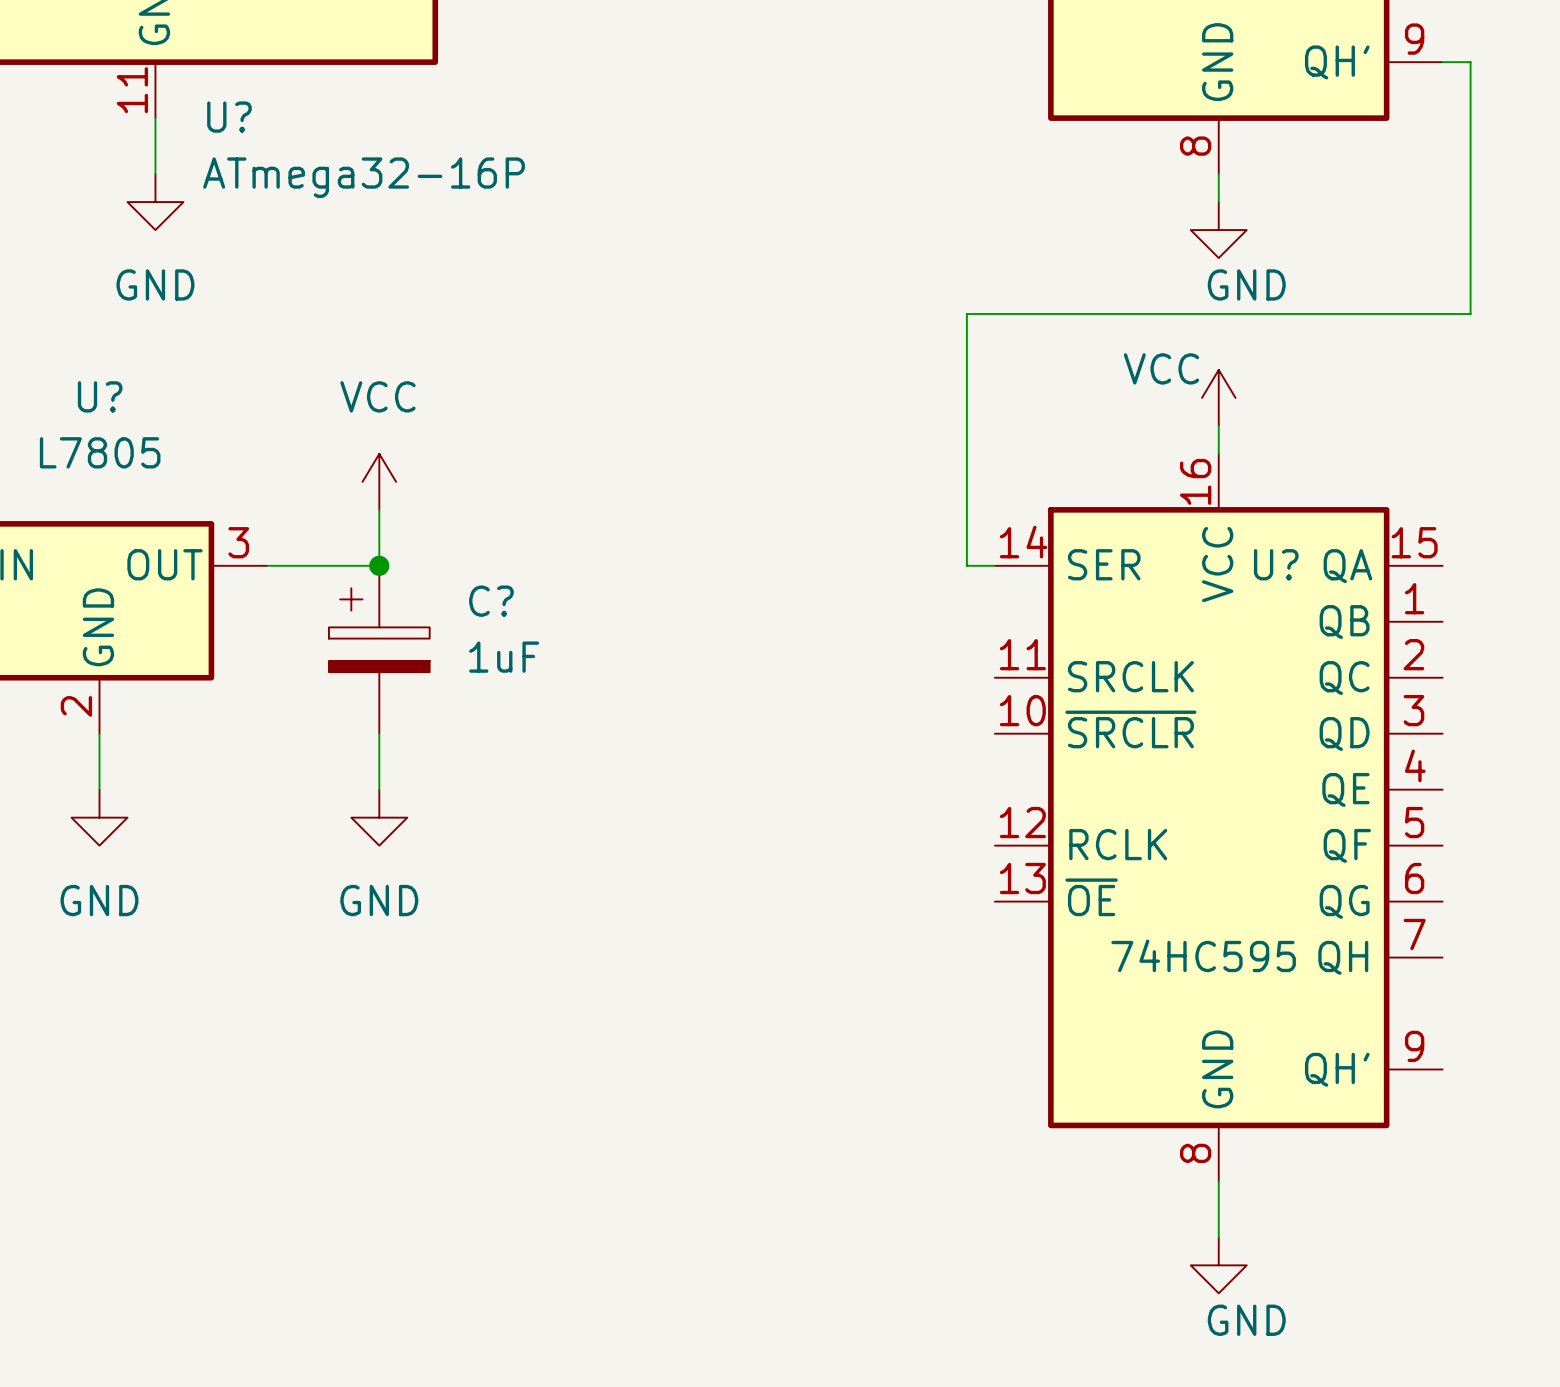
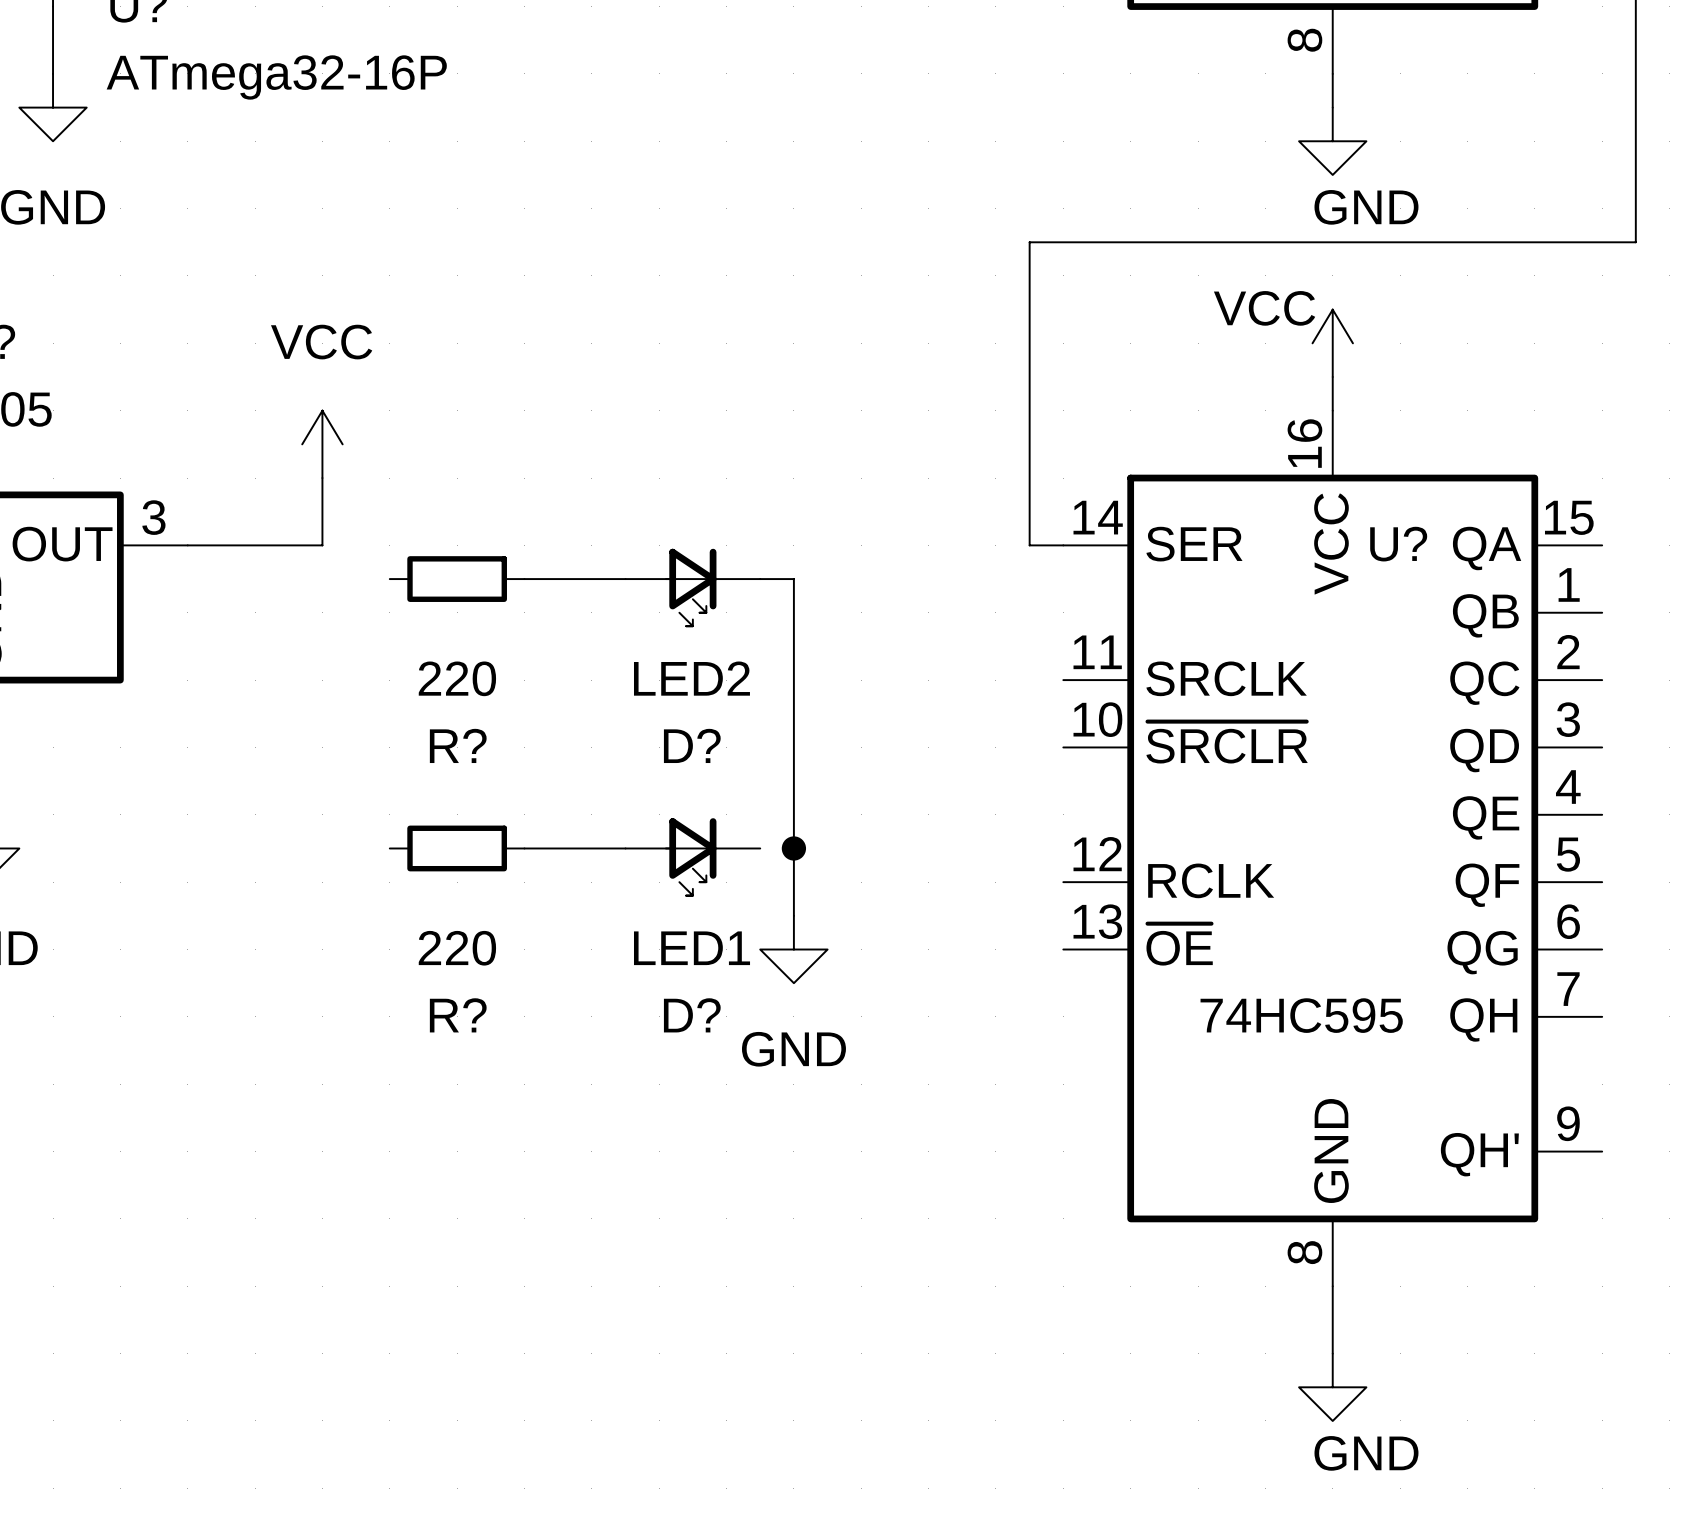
junction: (379, 565) -> none
R?: none -> 220 (457, 579)
wire: none -> (524, 579) (625, 579)
wire: none -> (760, 579) (793, 579) (793, 915)
D?: none -> LED2 (692, 587)
C?: 1uF (379, 649) -> none
wire: (379, 733) (379, 789) -> none
power symbol: GND (379, 817) -> none
R?: none -> 220 (457, 848)
wire: none -> (524, 848) (625, 848)
junction: none -> (793, 848)
D?: none -> LED1 (692, 856)
power symbol: none -> GND (793, 949)

